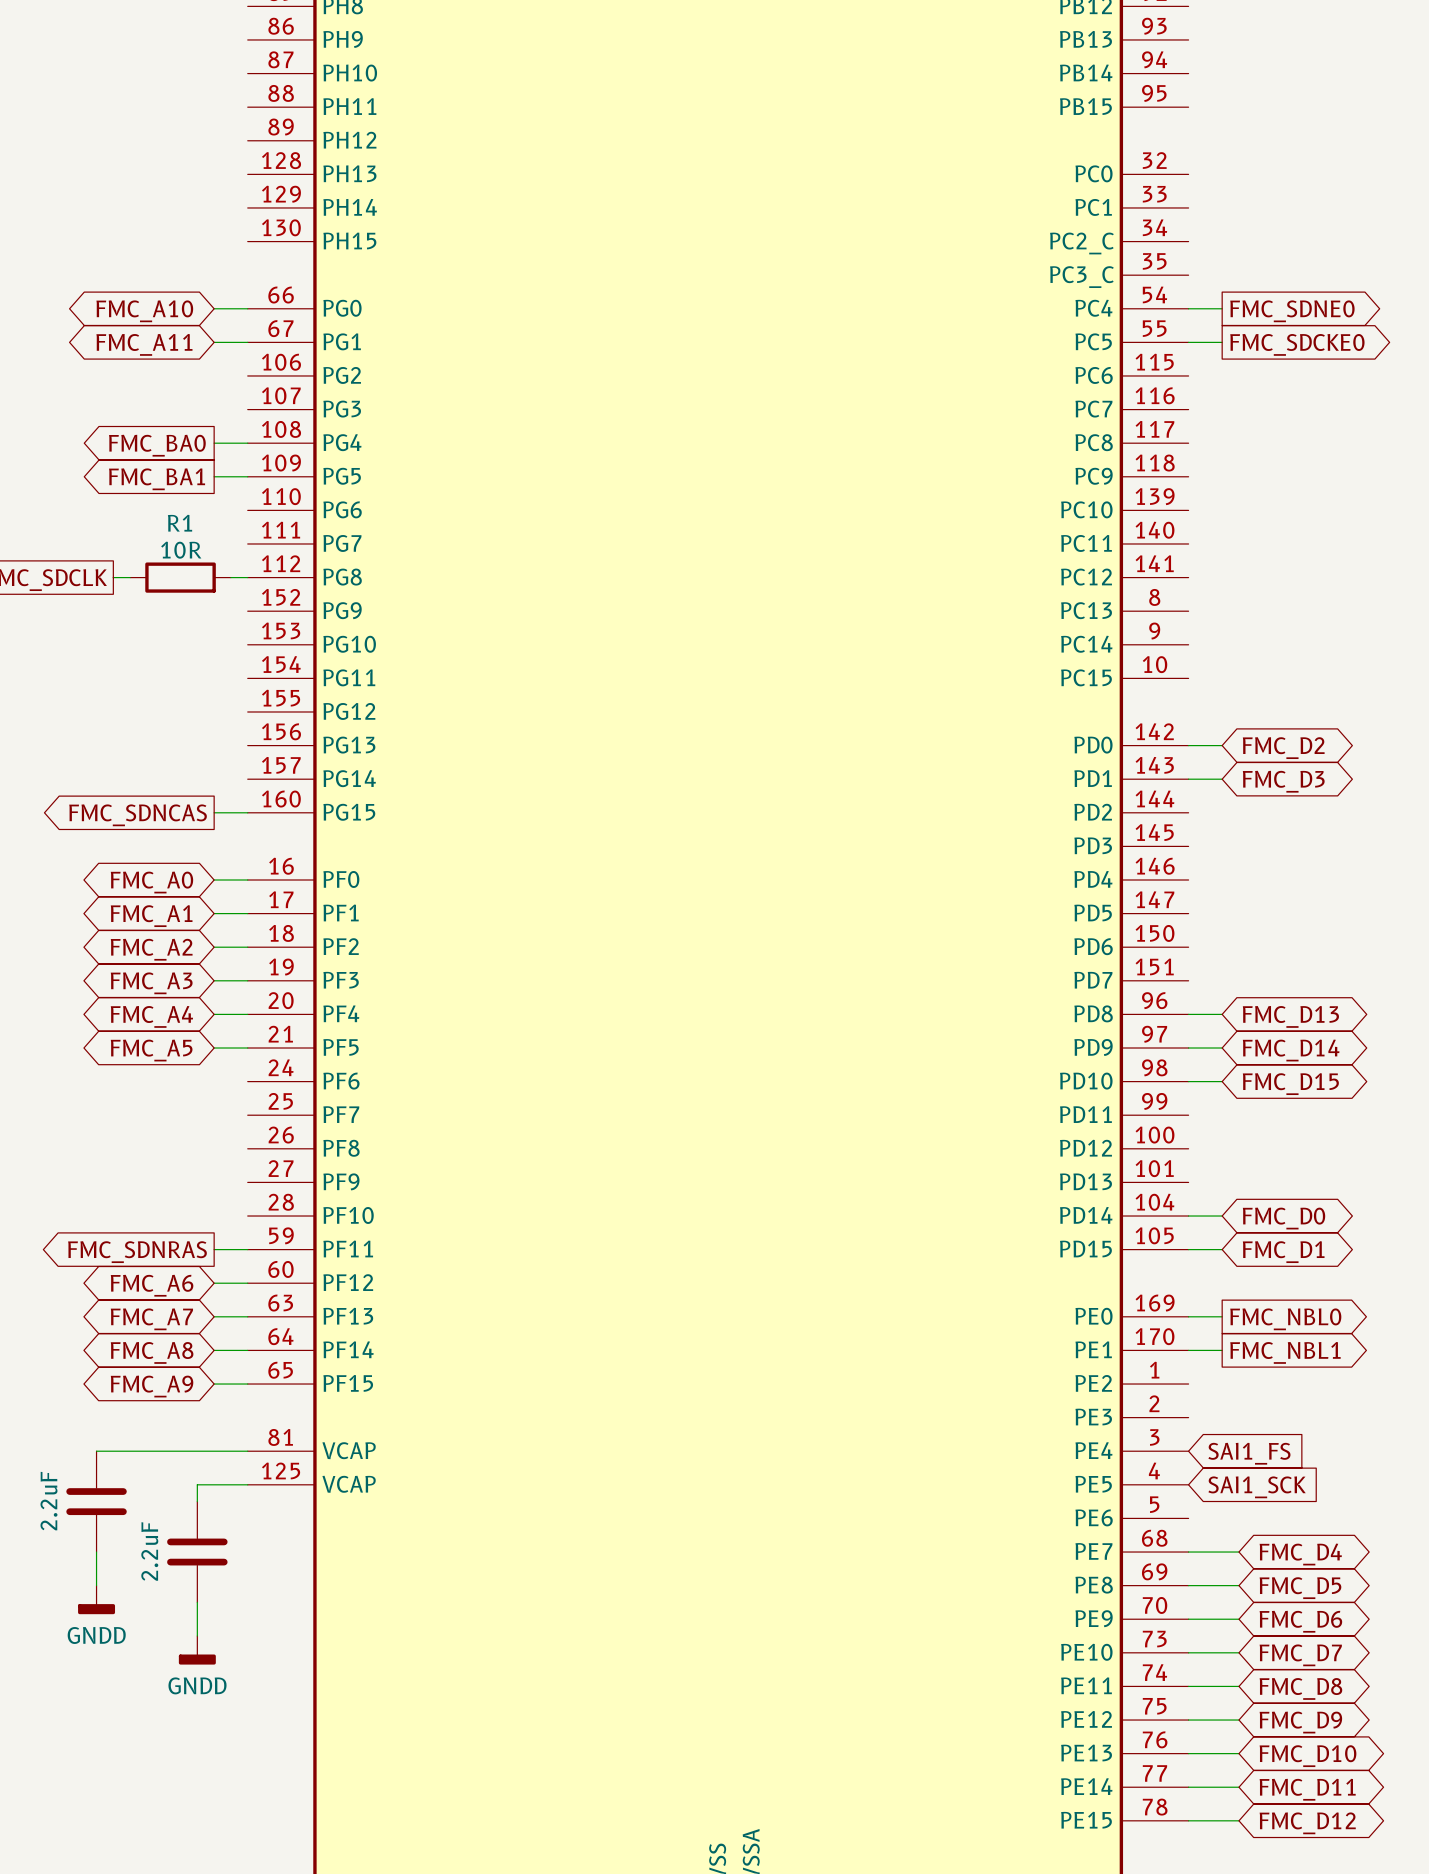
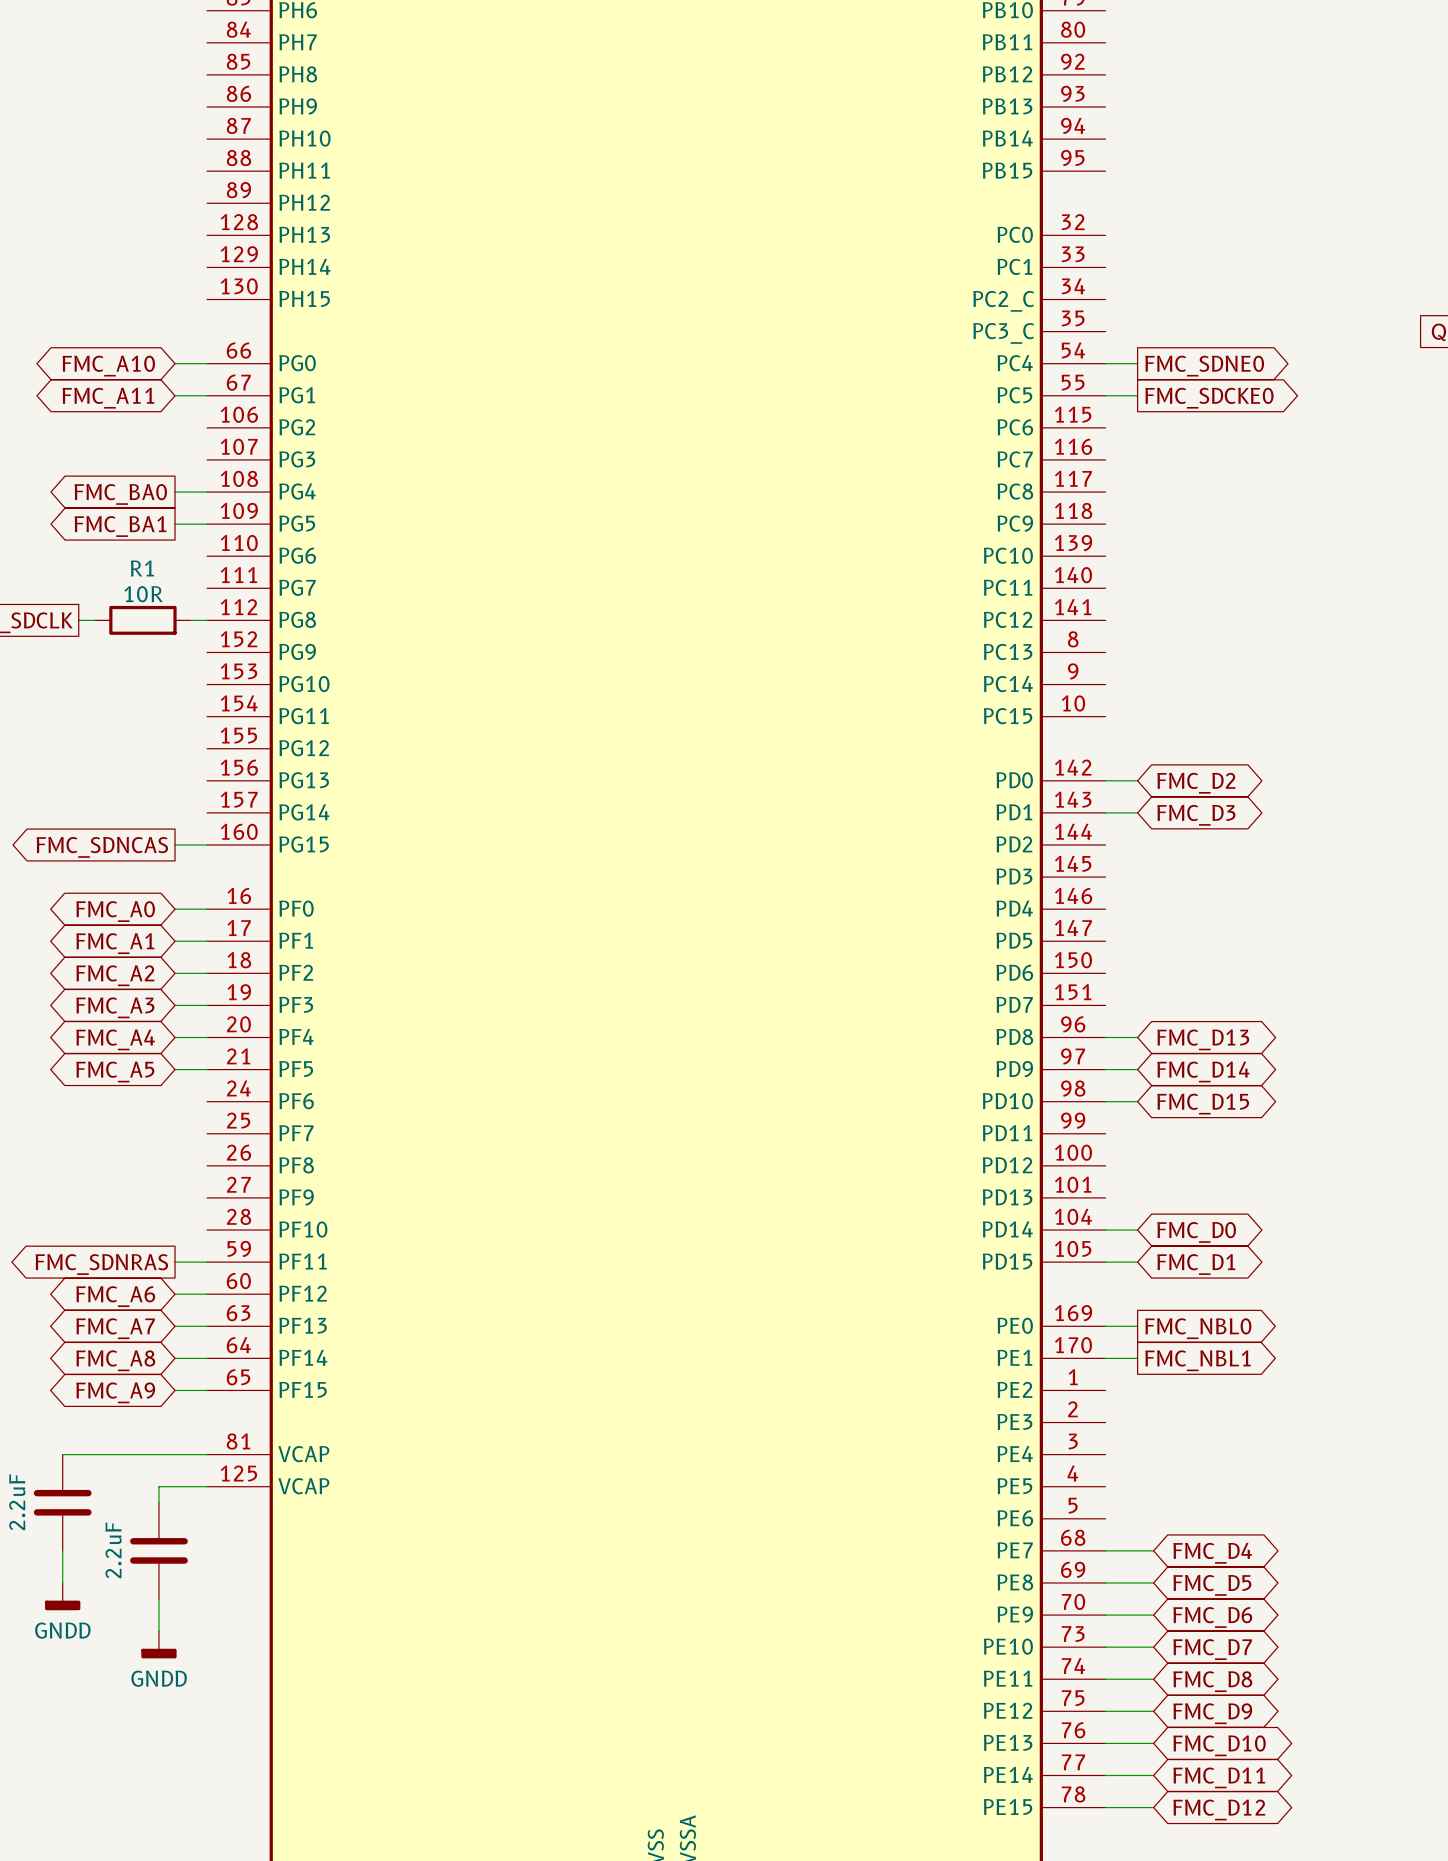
global label: SAI1_FS (1249, 1453) -> none
global label: SAI1_SCK (1257, 1487) -> none

